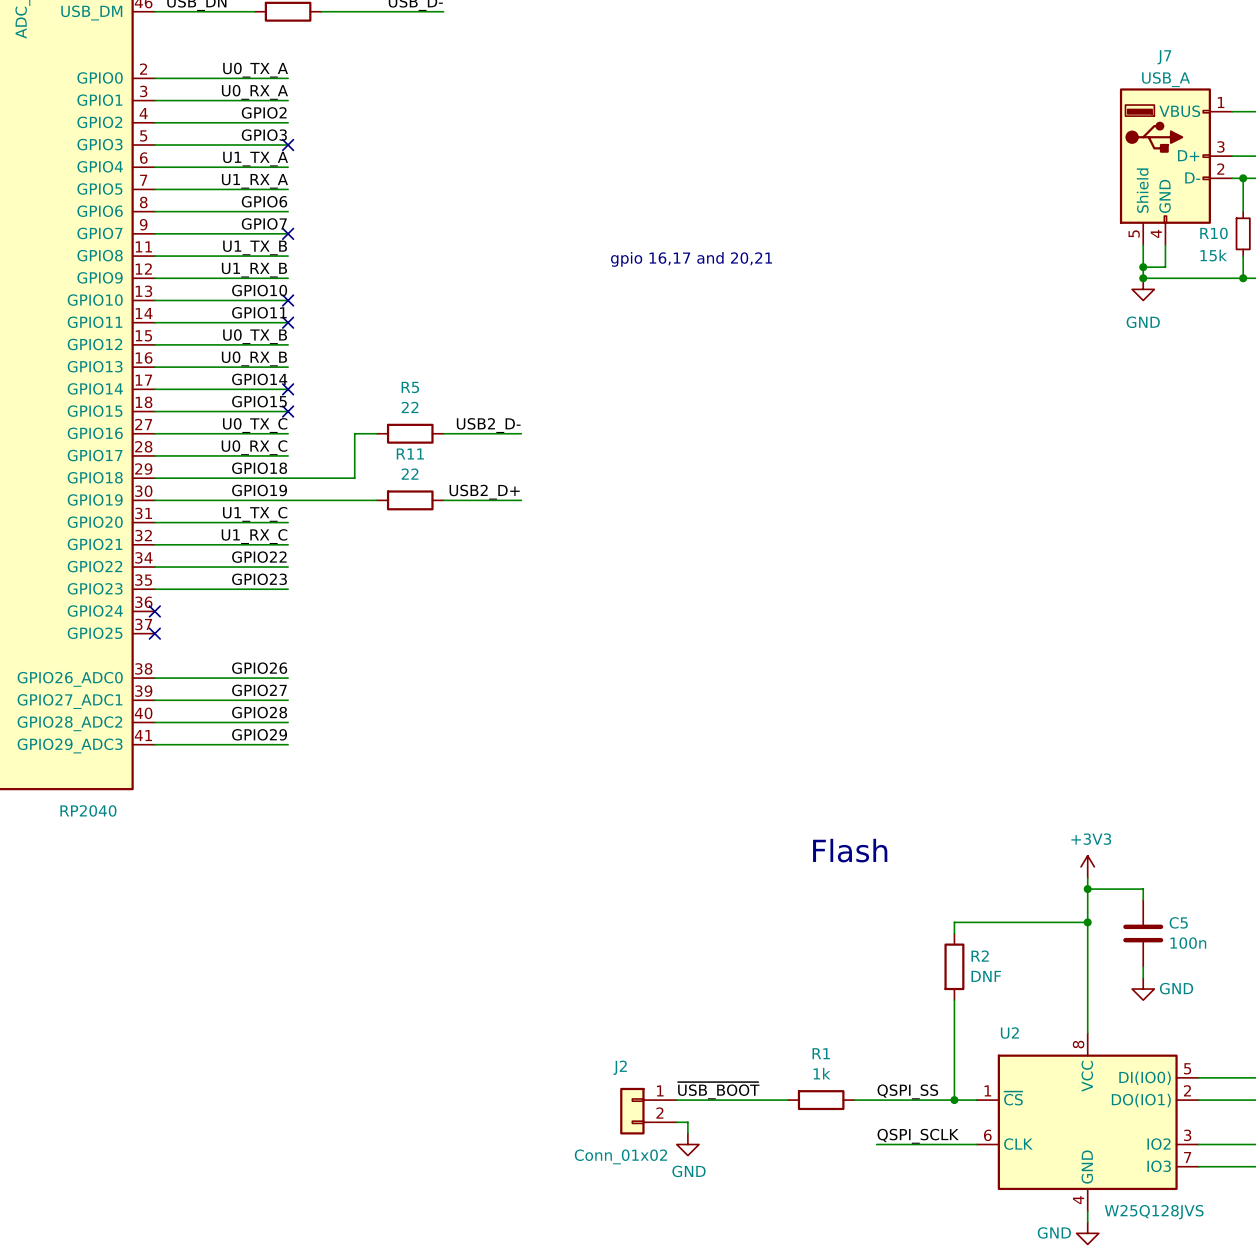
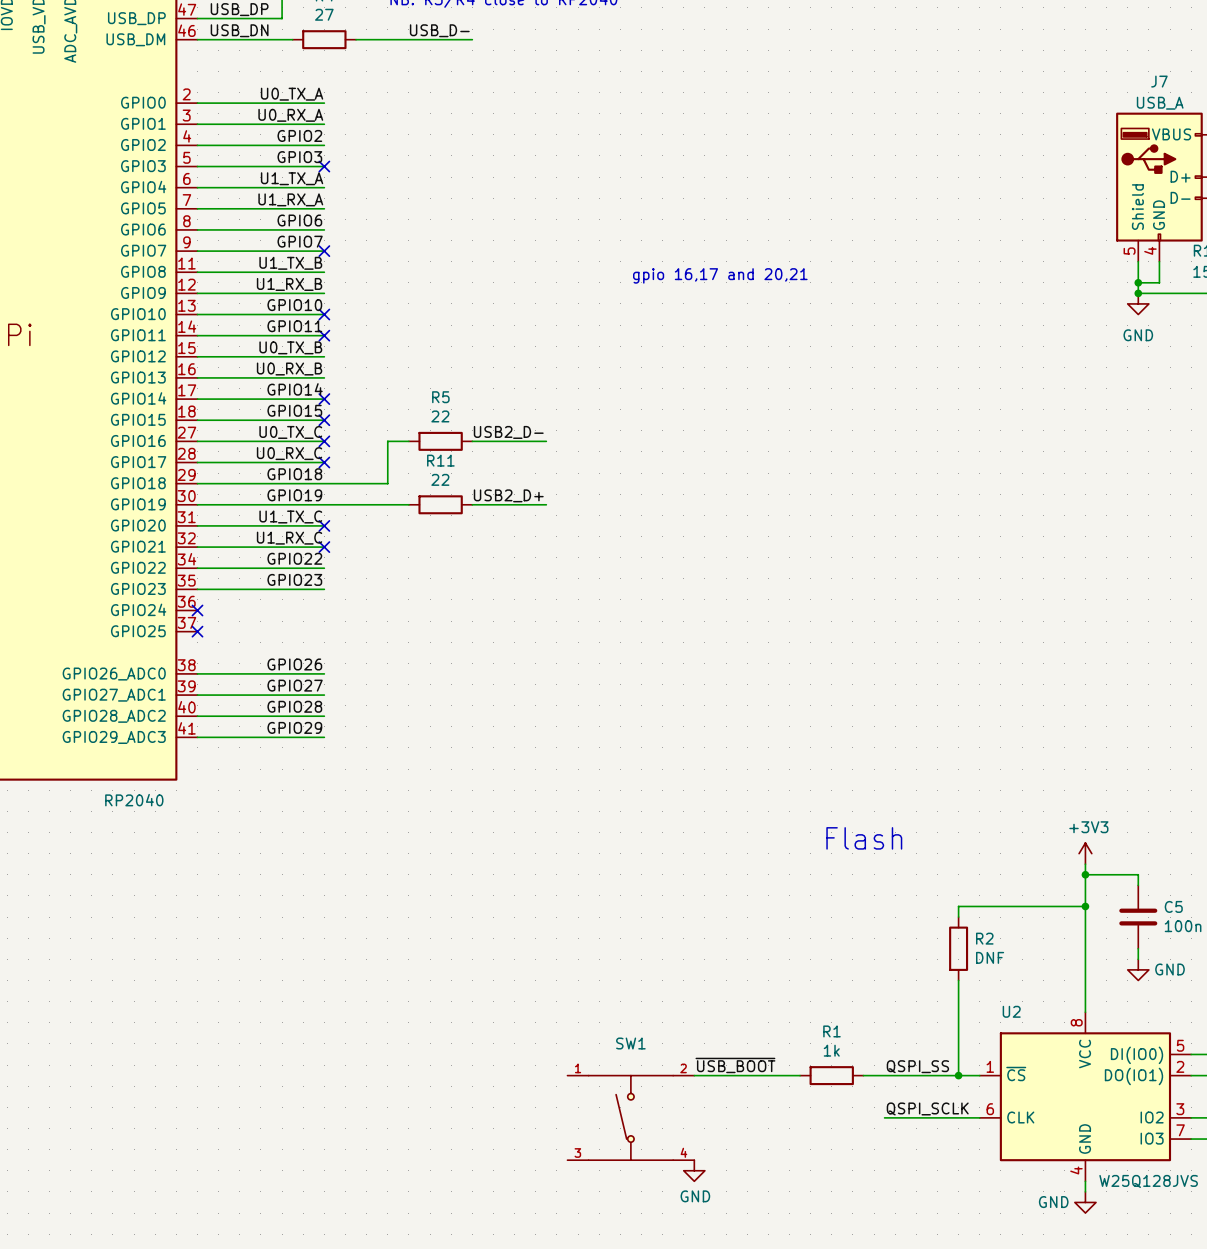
no-connect mark: none -> (324, 441)
no-connect mark: none -> (324, 462)
no-connect mark: none -> (324, 525)
no-connect mark: none -> (324, 547)
J2: Conn_01x02 (648, 1111) -> none
wire: (676, 1122) (687, 1122) (687, 1133) -> none
SW1: none -> (630, 1117)
power symbol position: GND (687, 1144) -> GND (694, 1170)

